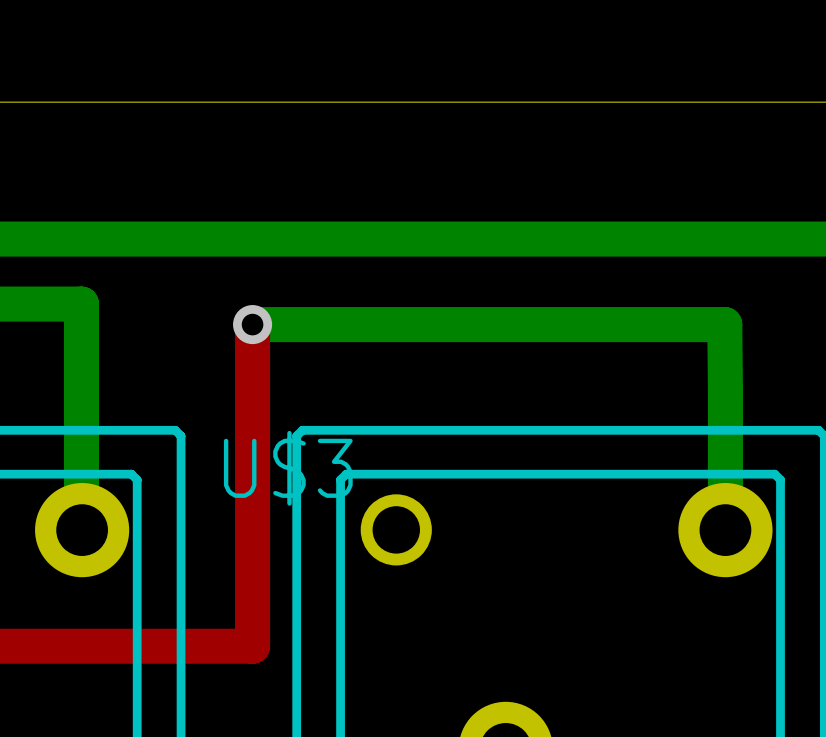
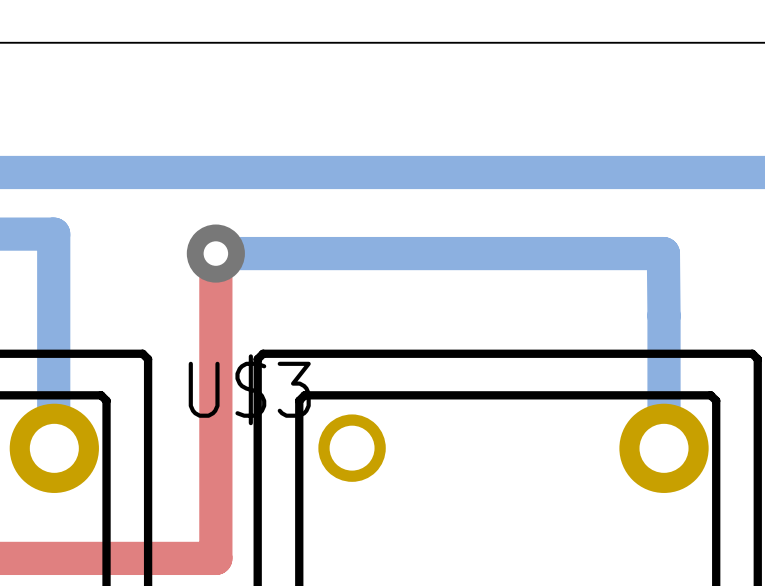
via size: [233, 305, 273, 345] -> [186, 224, 245, 283]

